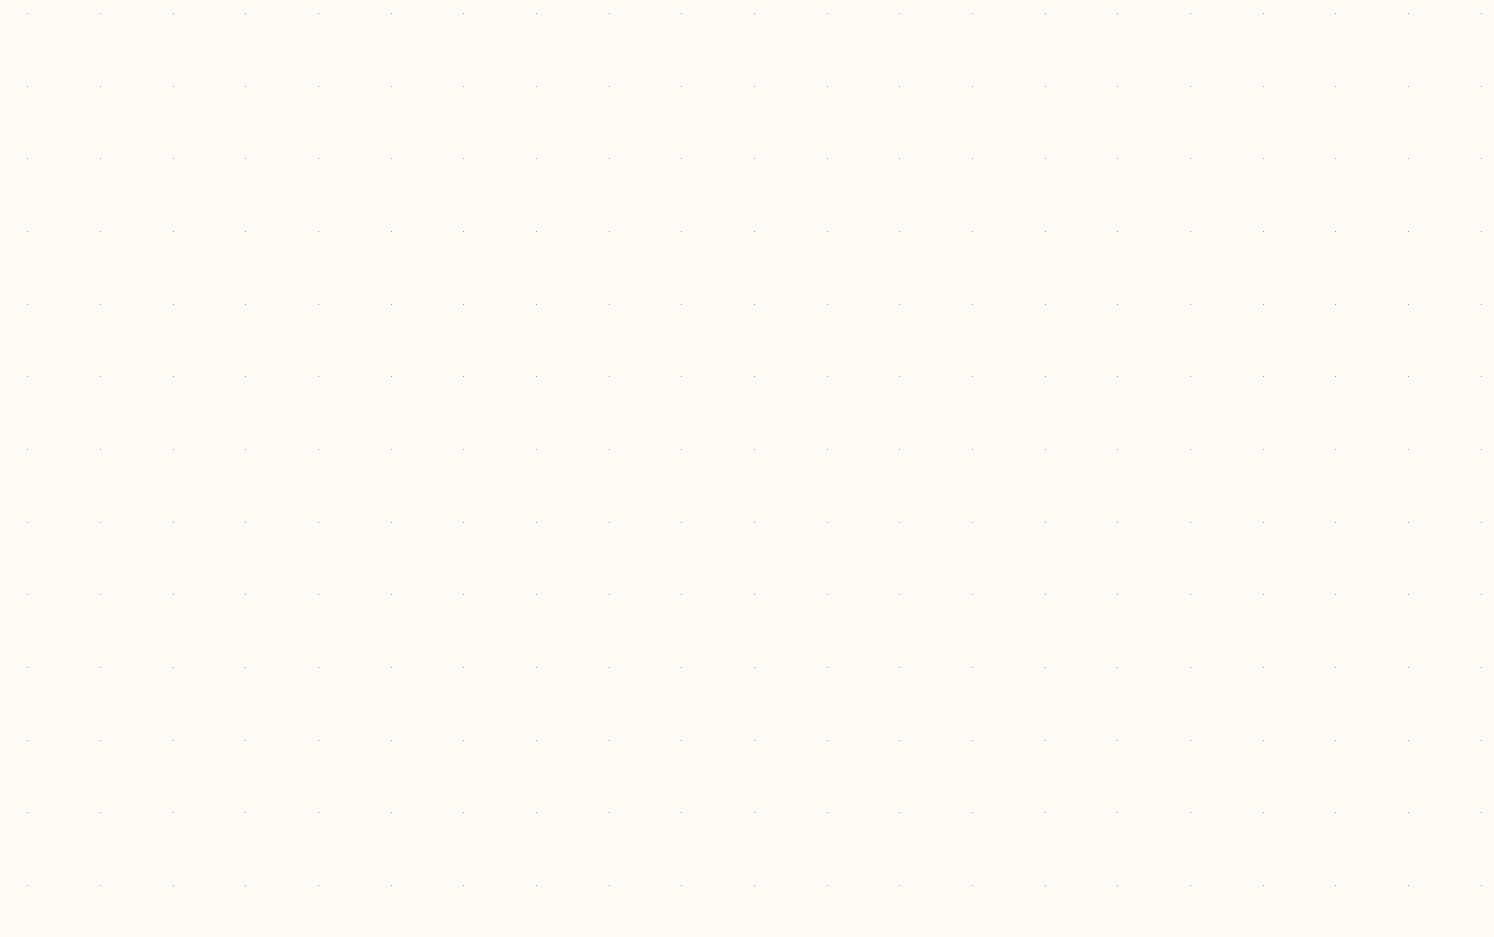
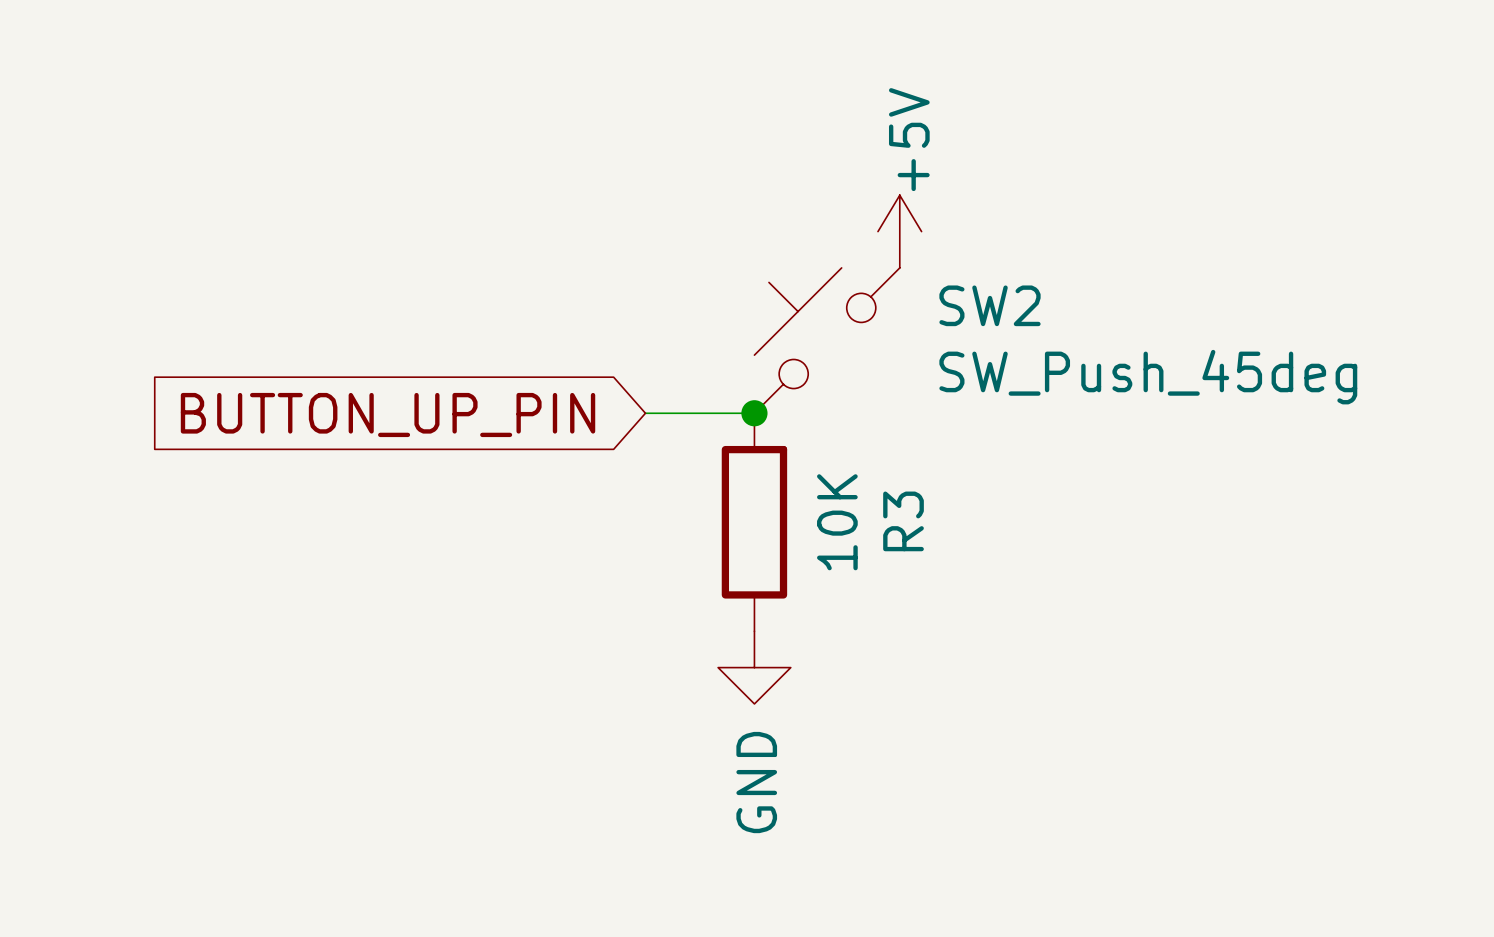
power symbol: none -> +5V (899, 231)
SW2: none -> SW_Push_45deg (827, 340)
global label: none -> BUTTON_UP_PIN (388, 414)
wire: none -> (645, 413) (754, 413)
junction: none -> (754, 413)
R3: none -> 10K (754, 522)
power symbol: none -> GND (754, 667)

